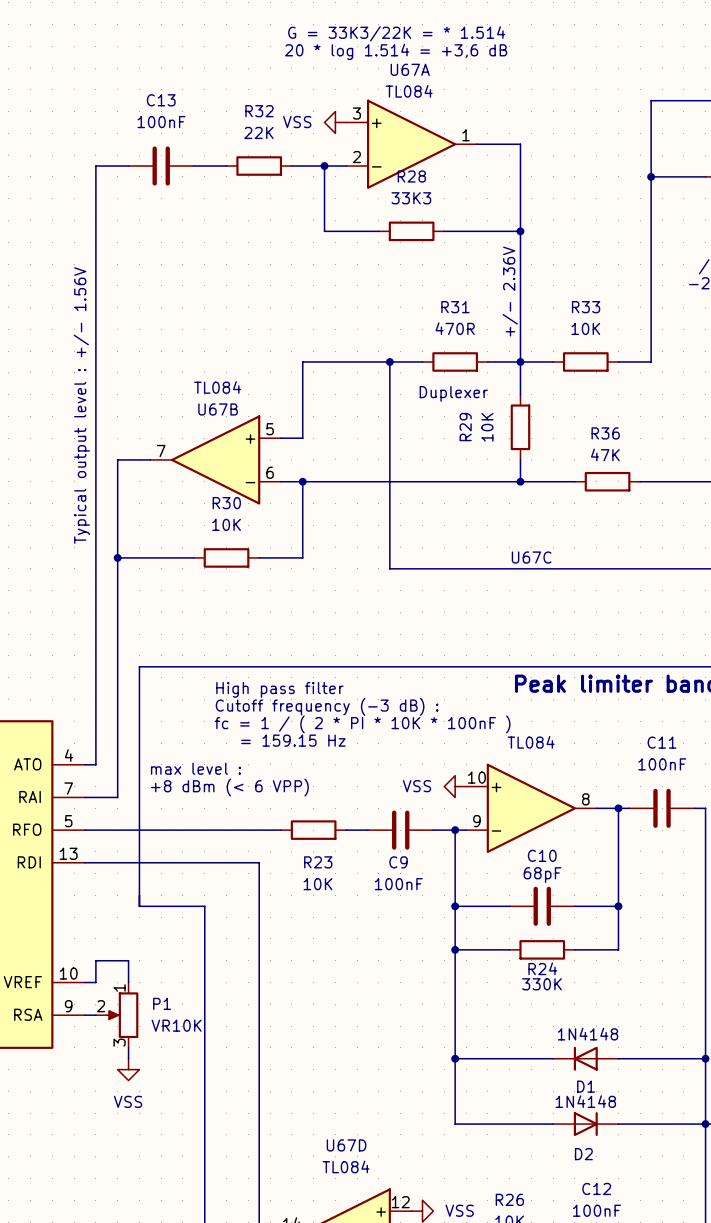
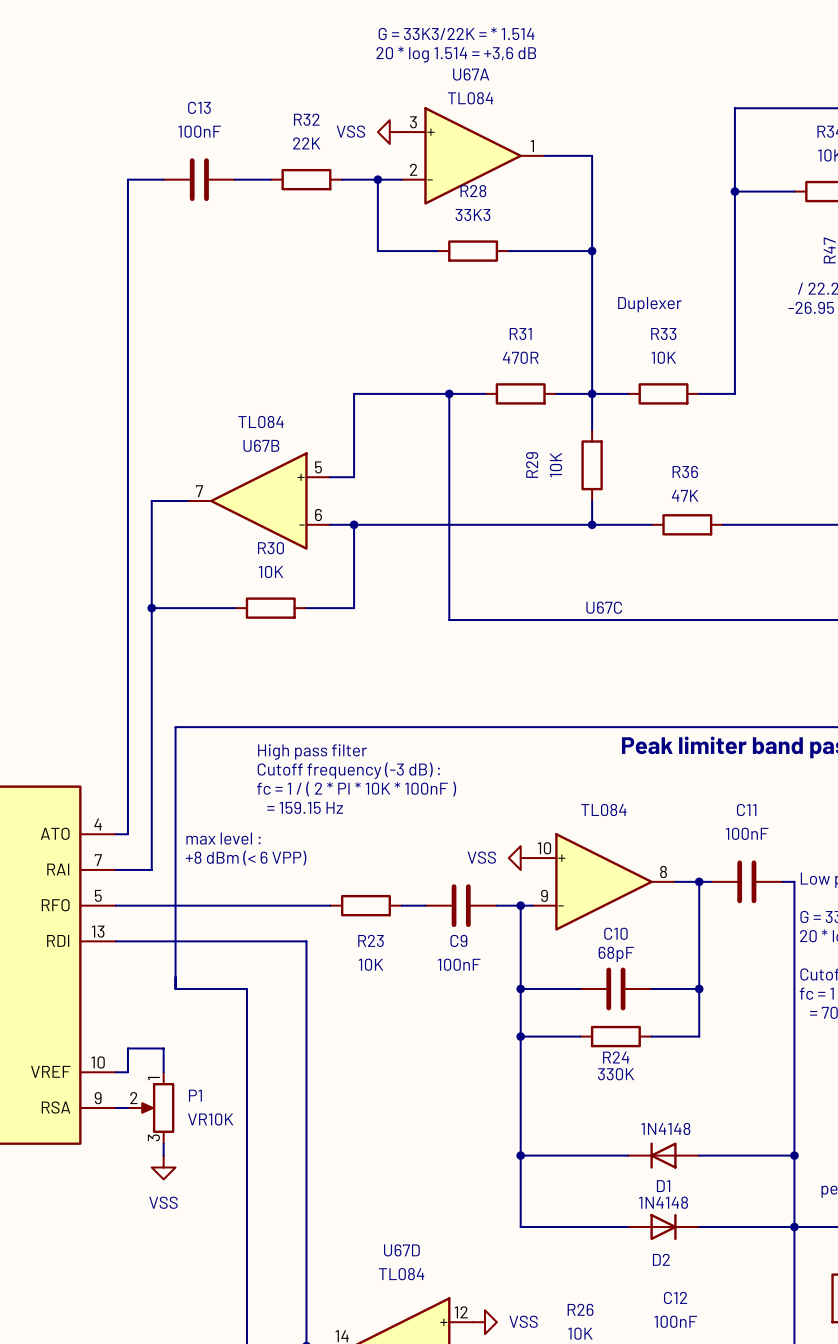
text: +/- 2.36V (510, 291) -> none
text position: Duplexer (453, 393) -> Duplexer (649, 304)
text: Typical output level : +/- 1.56V (81, 405) -> none

